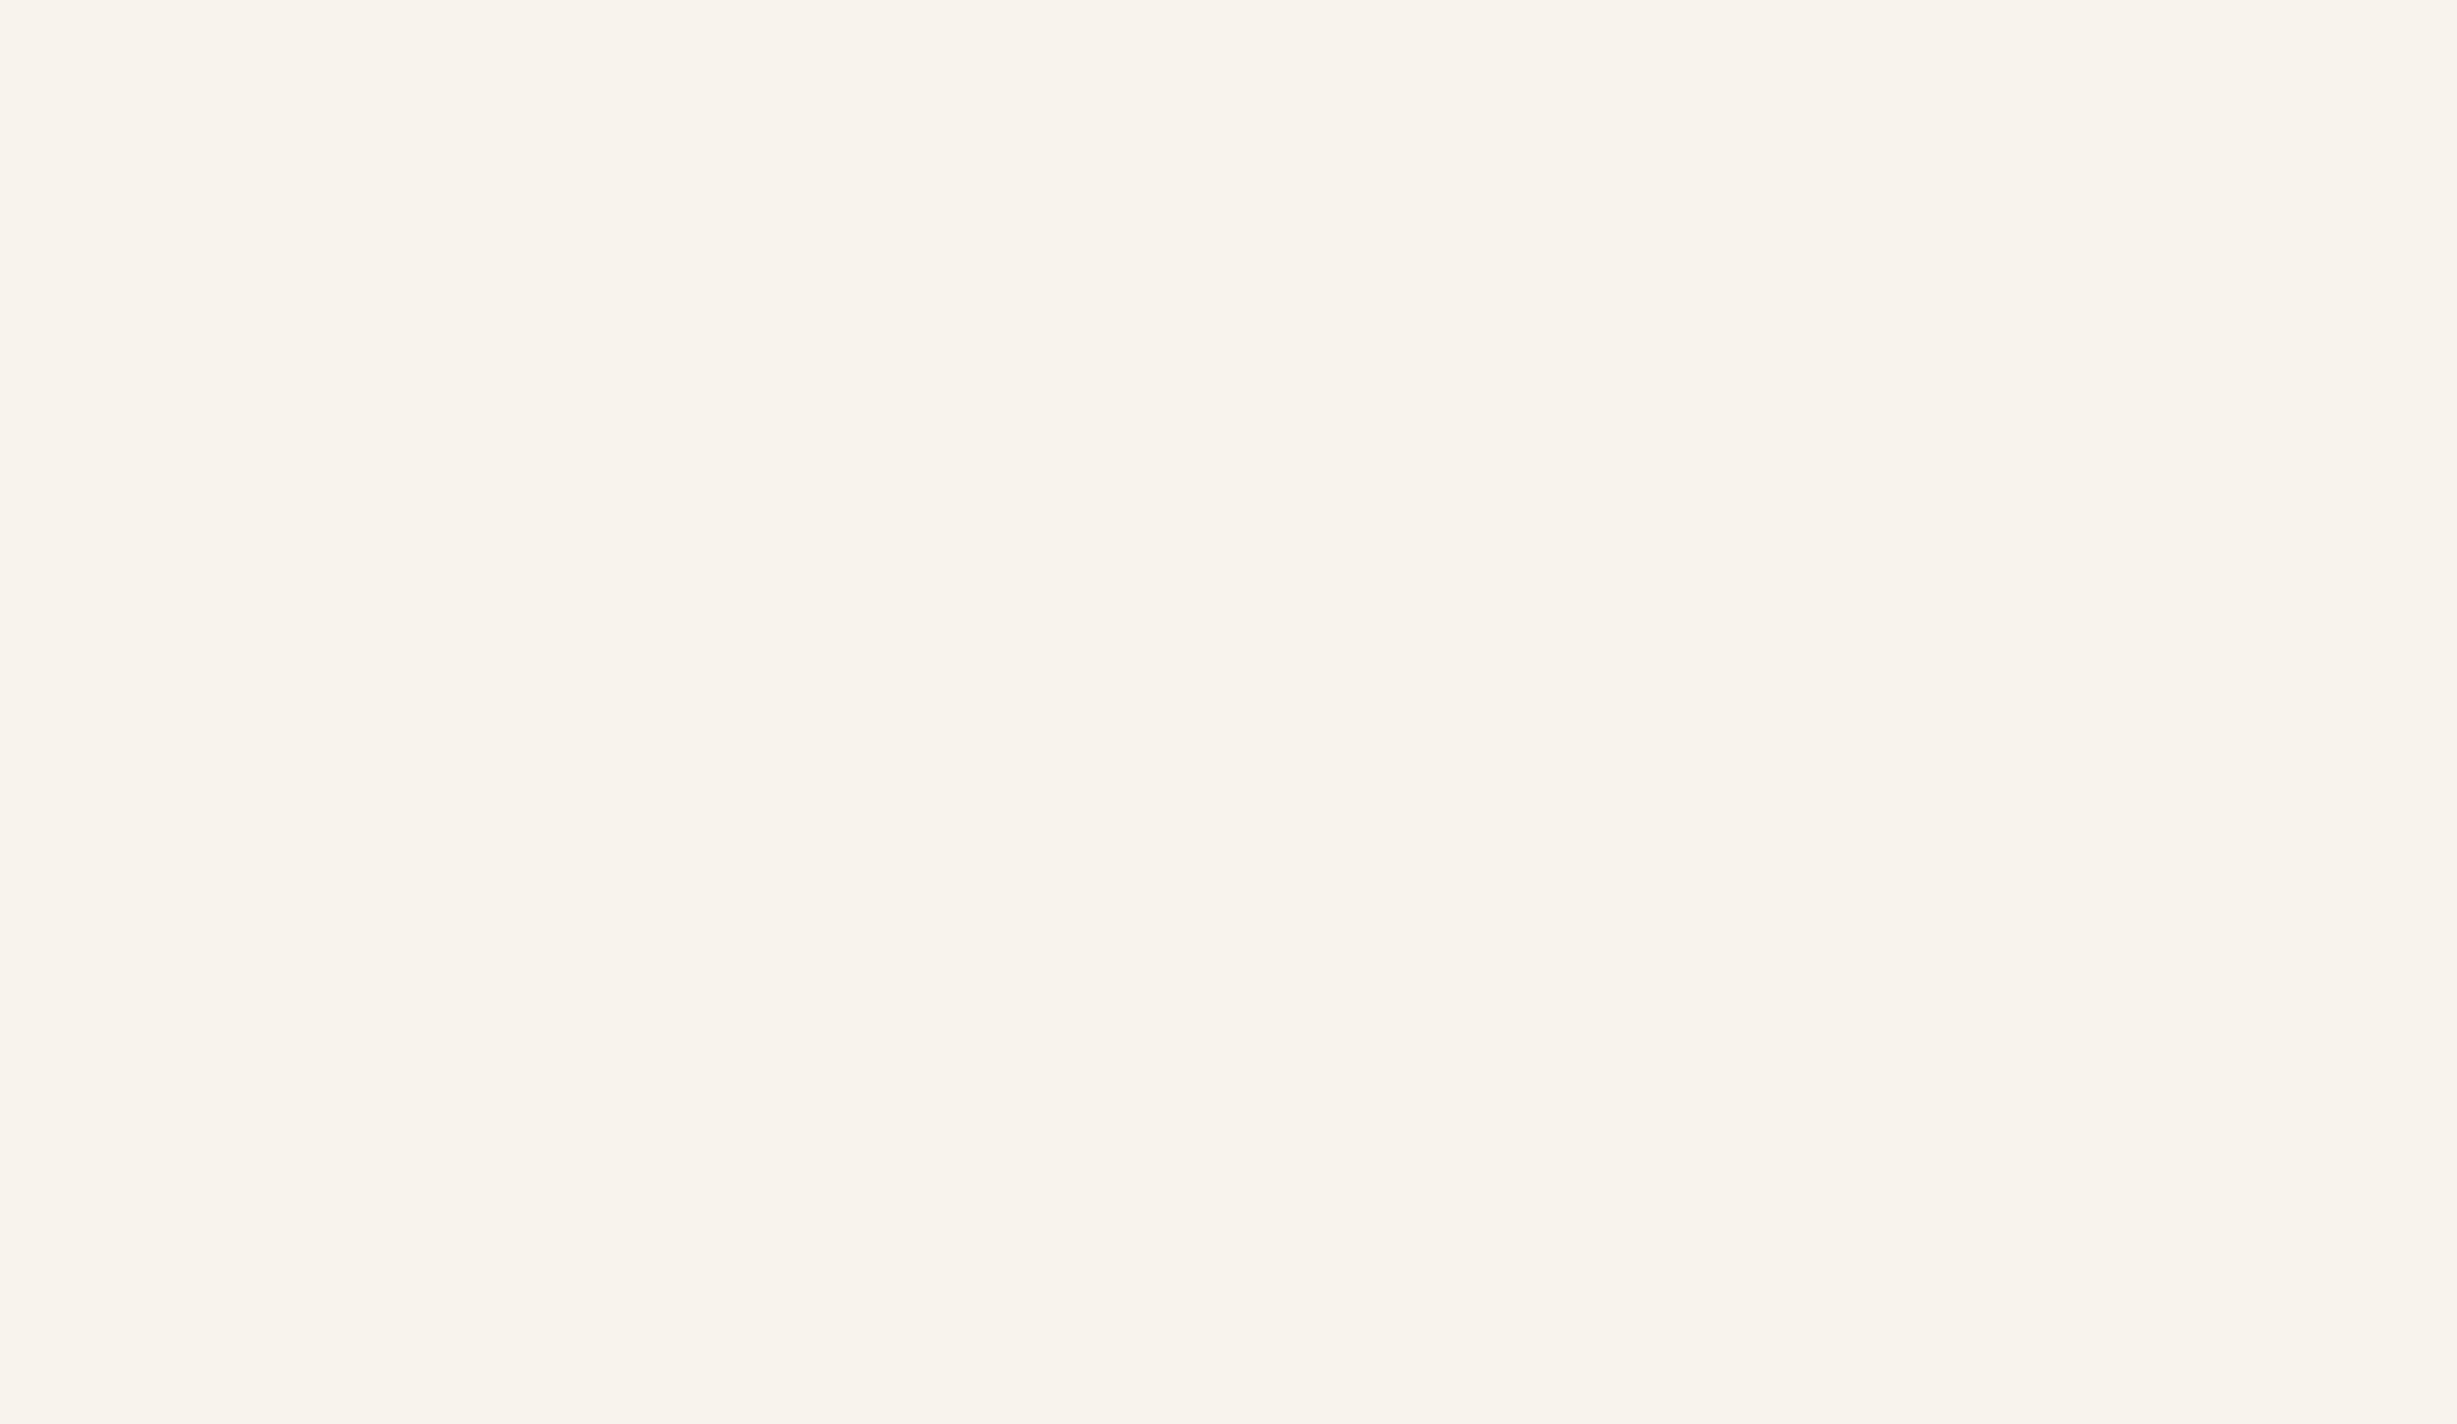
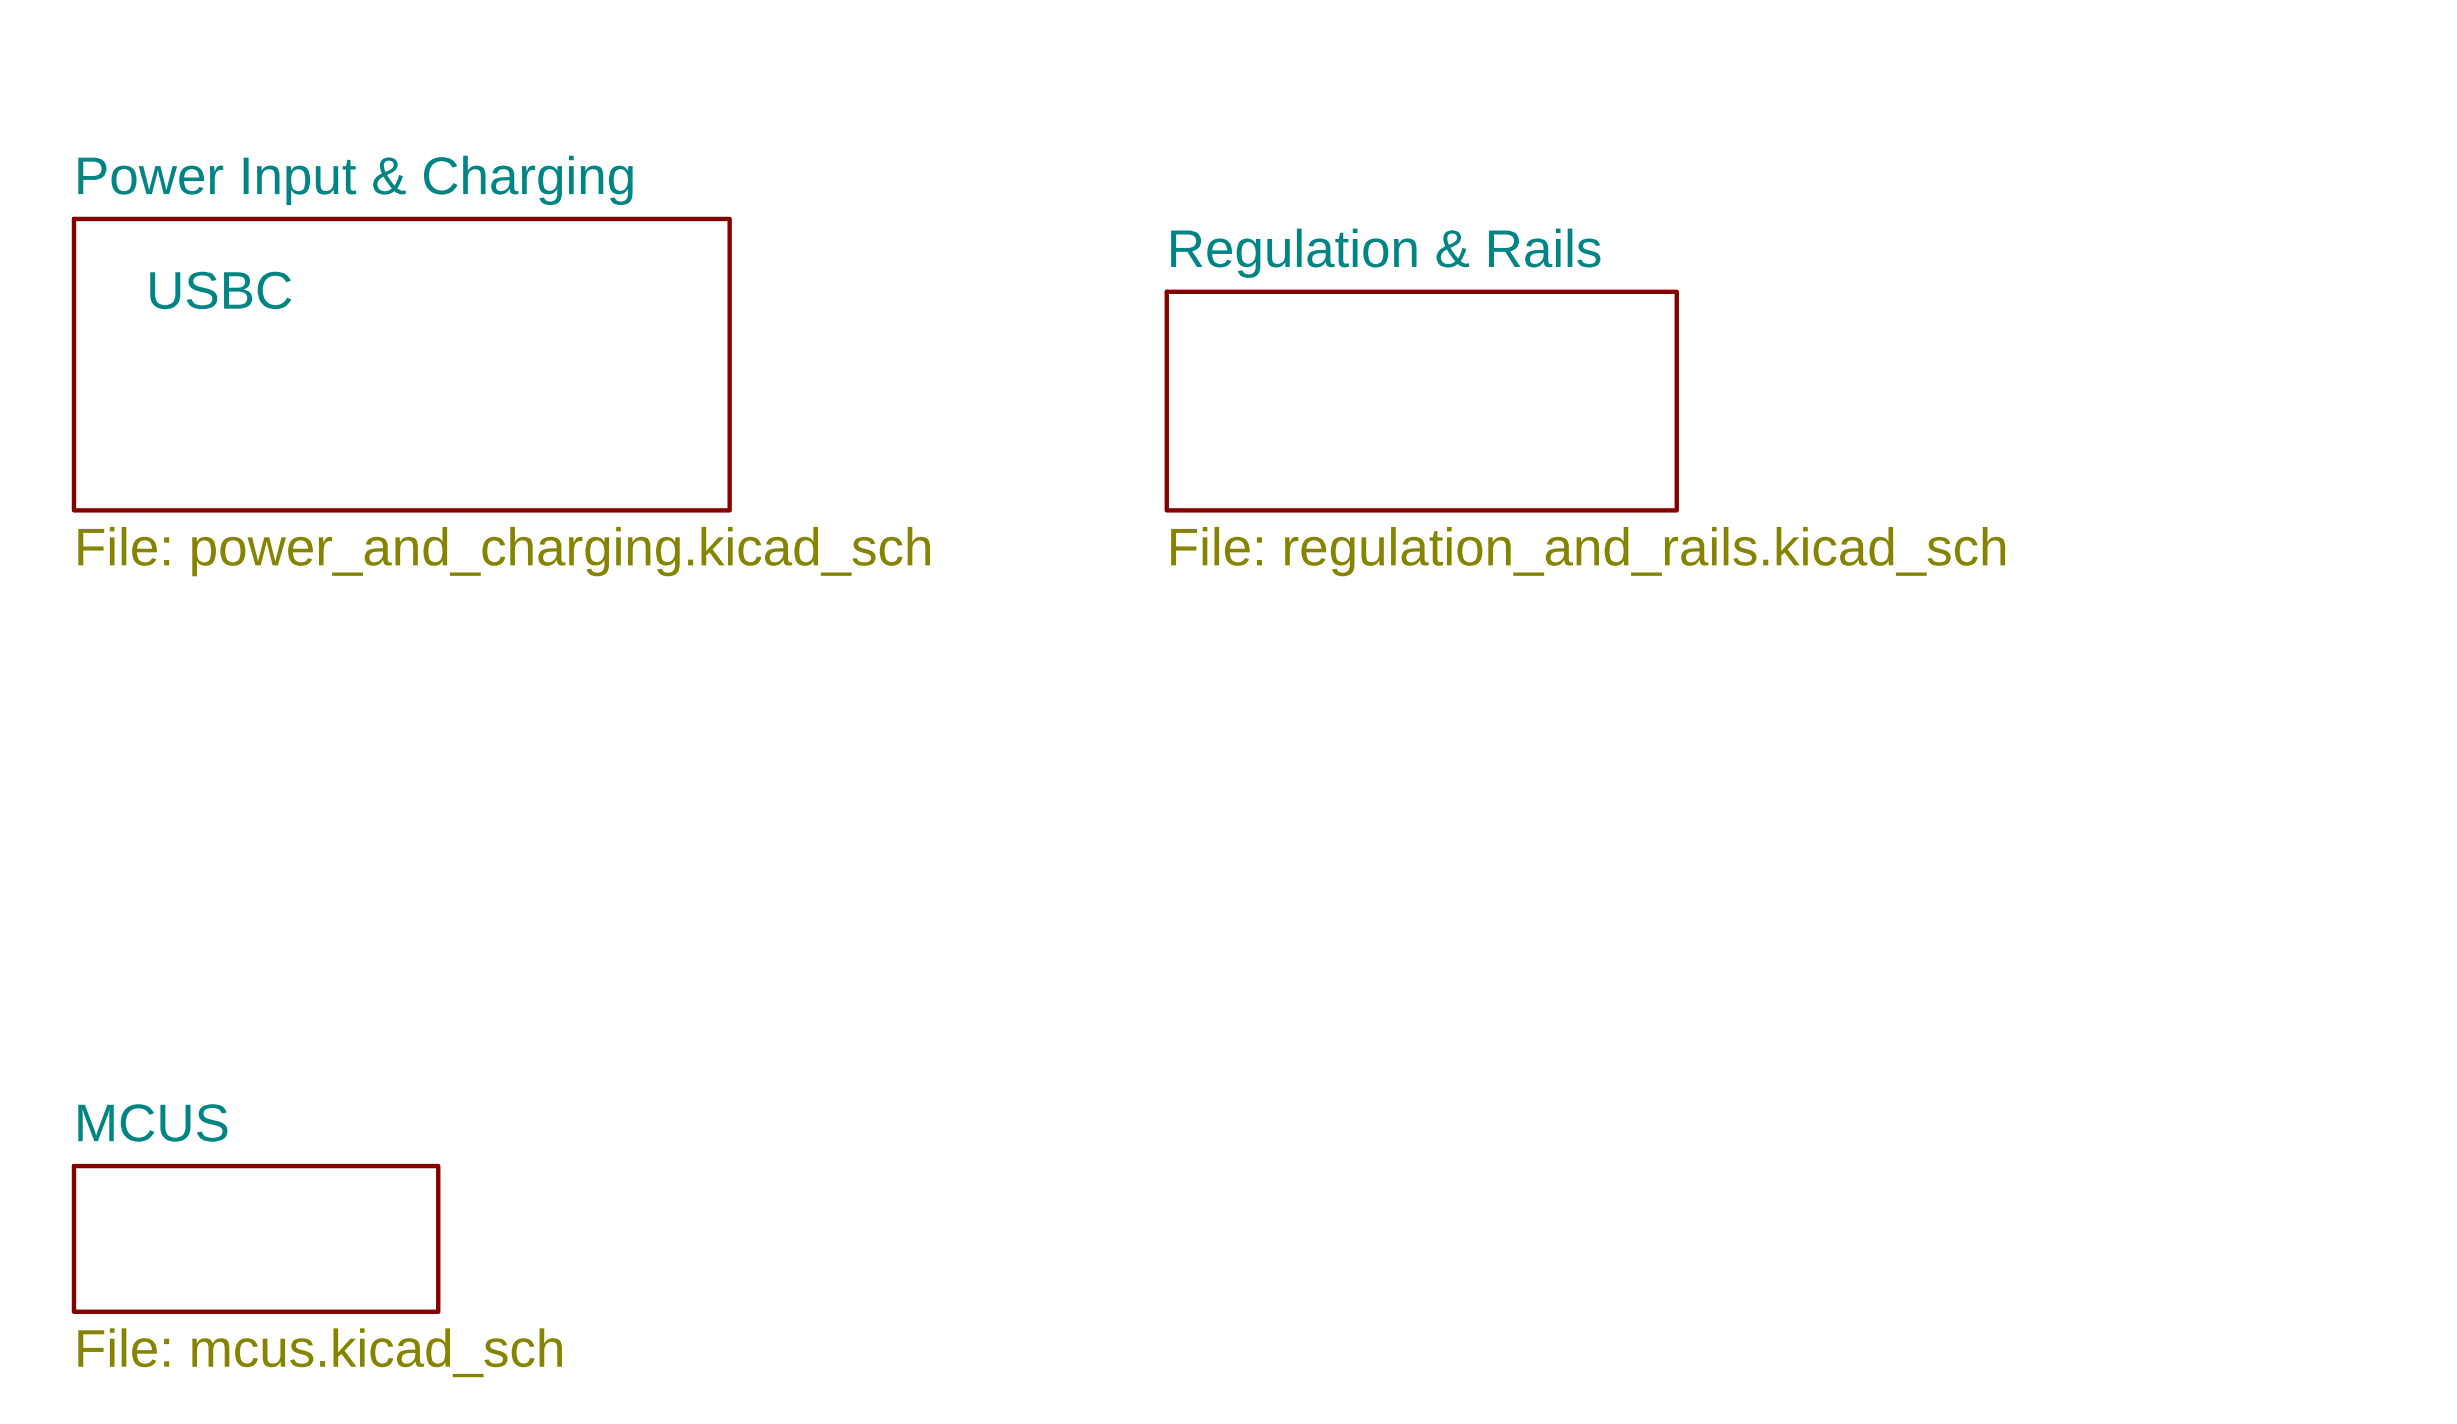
sheet Power Input & Charging: none -> File: power_and_charging.kicad_sch (401, 364)
sheet Regulation & Rails: none -> File: regulation_and_rails.kicad_sch (1421, 401)
sheet MCUS: none -> File: mcus.kicad_sch (256, 1238)

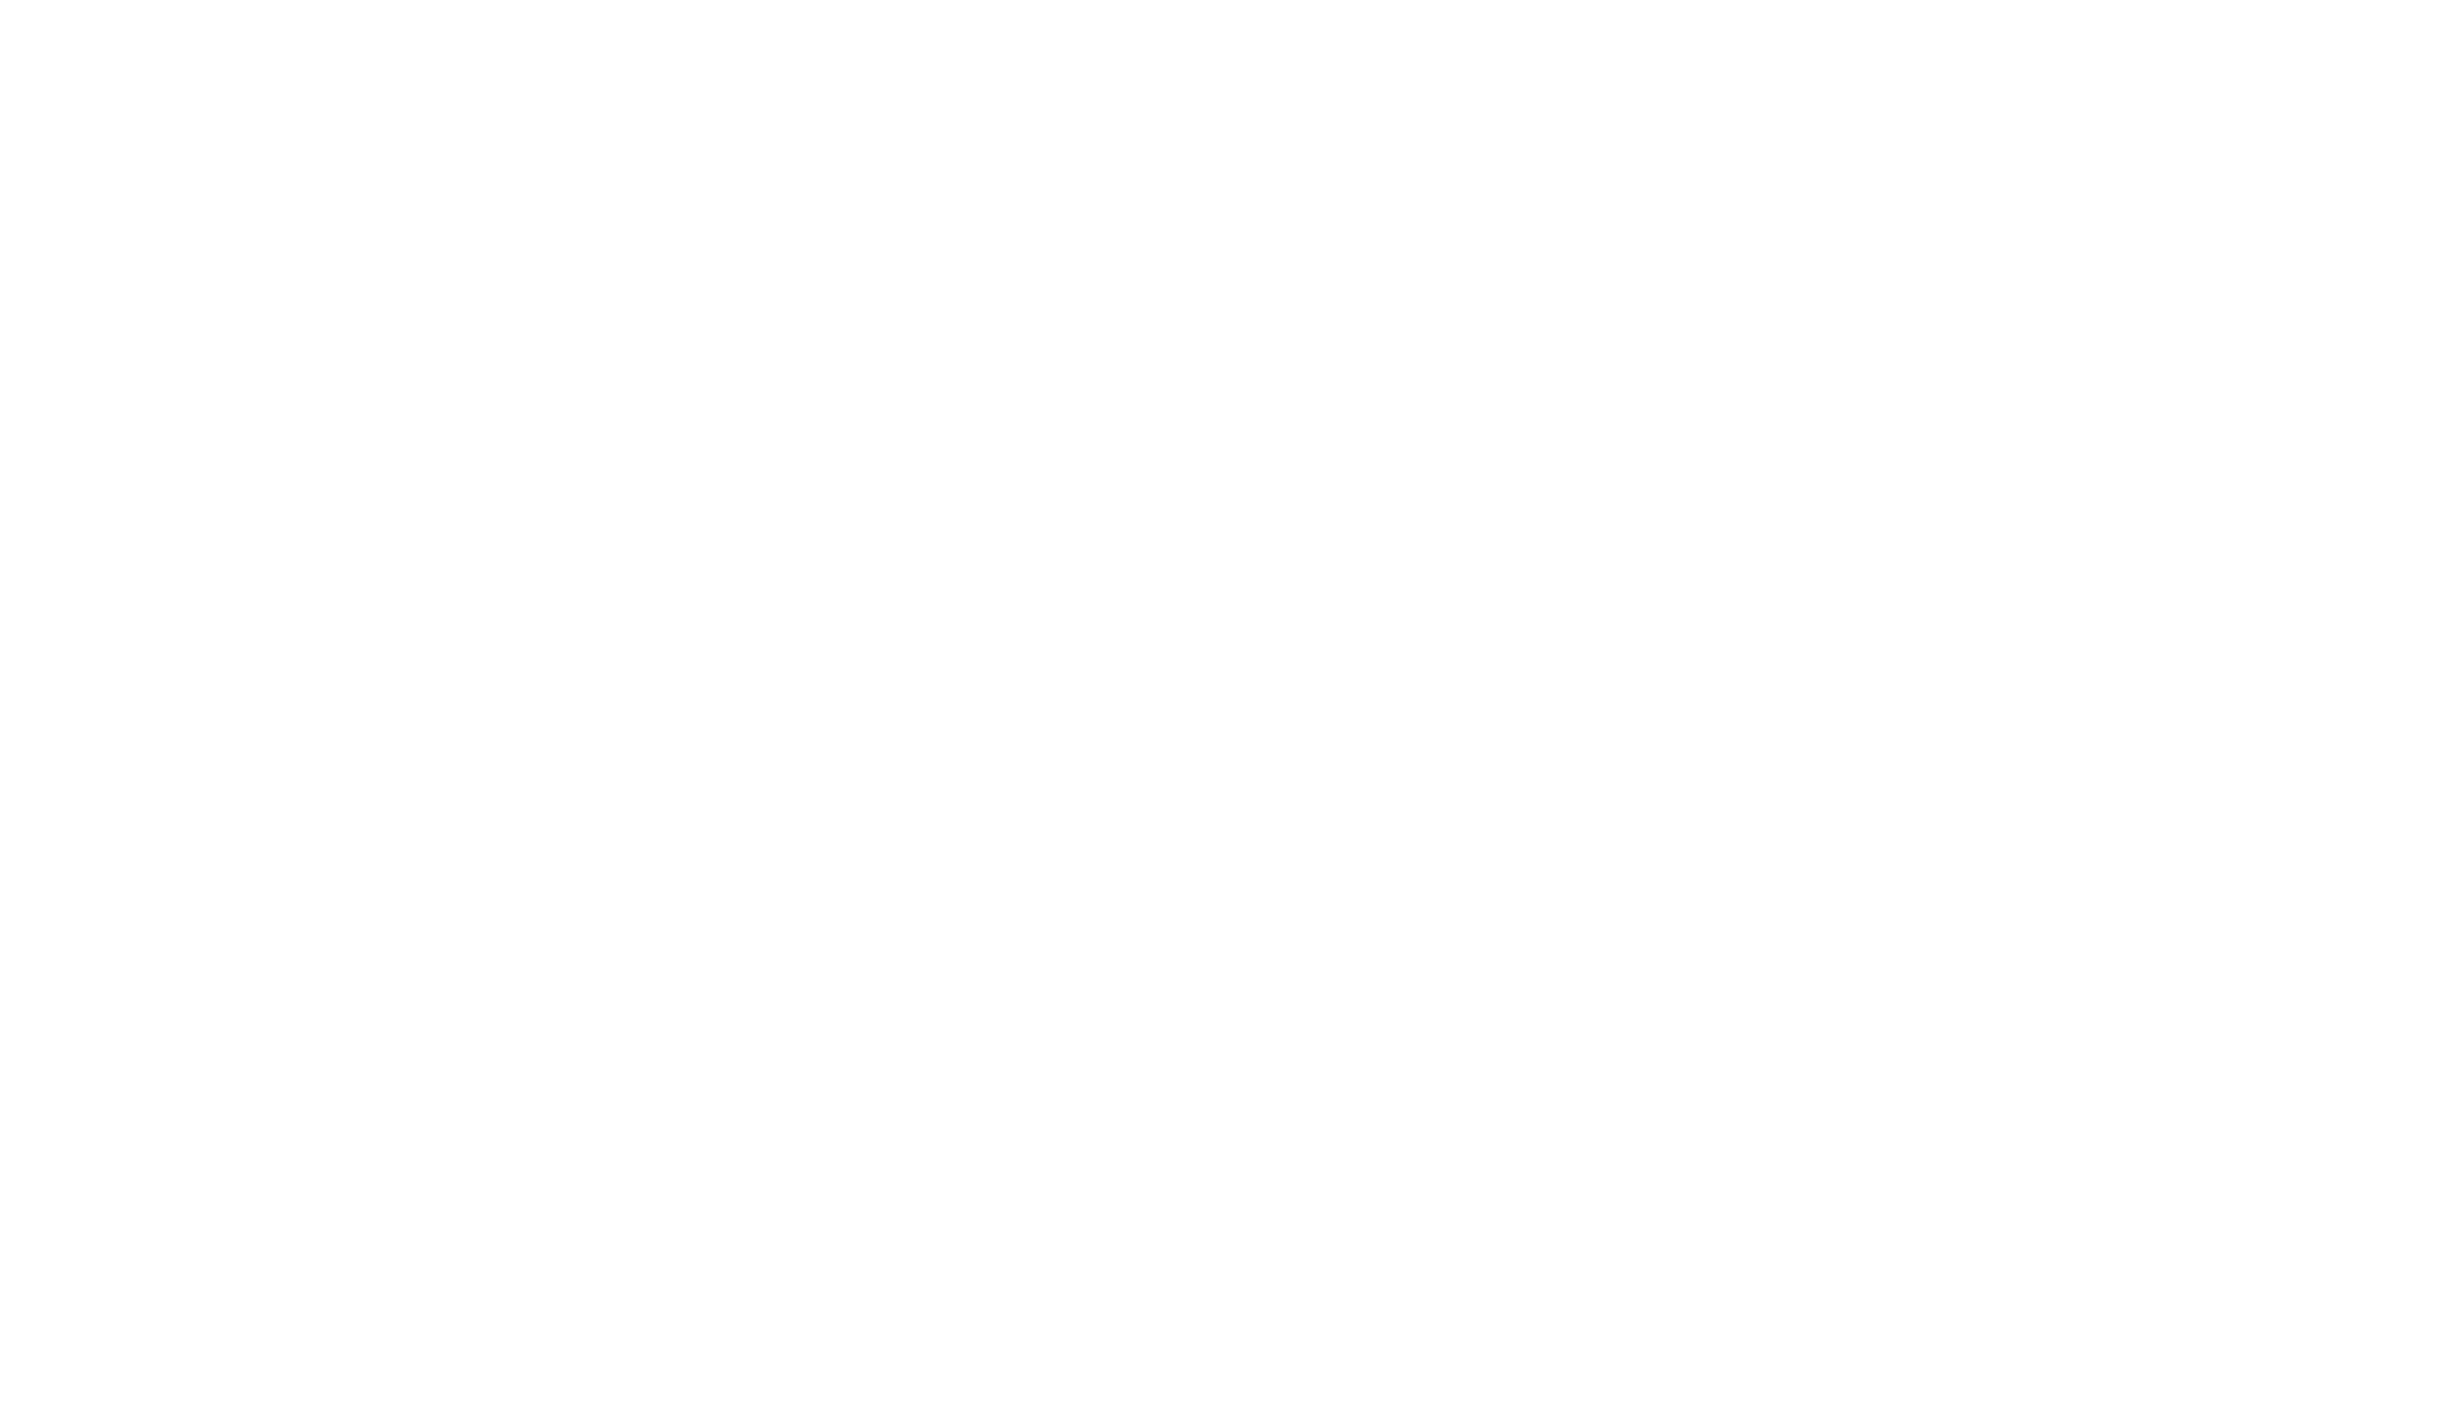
sheet Power Input & Charging: File: power_and_charging.kicad_sch (401, 364) -> none
sheet Regulation & Rails: File: regulation_and_rails.kicad_sch (1421, 401) -> none
sheet MCUS: File: mcus.kicad_sch (256, 1238) -> none

